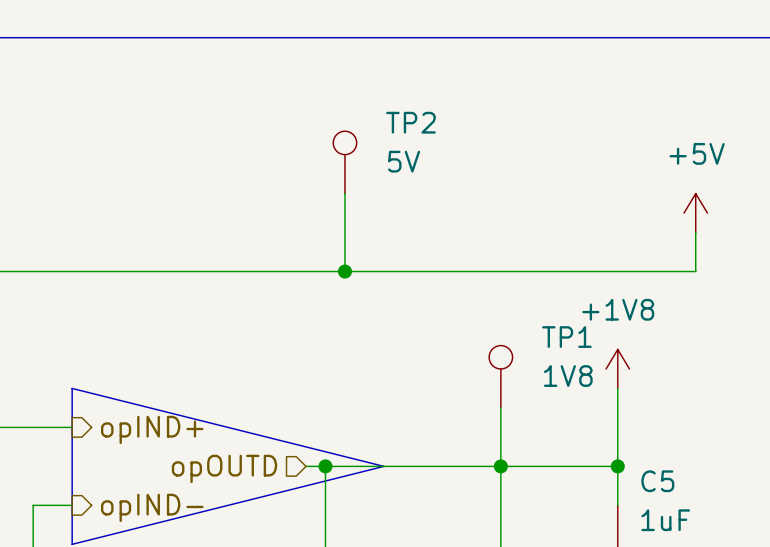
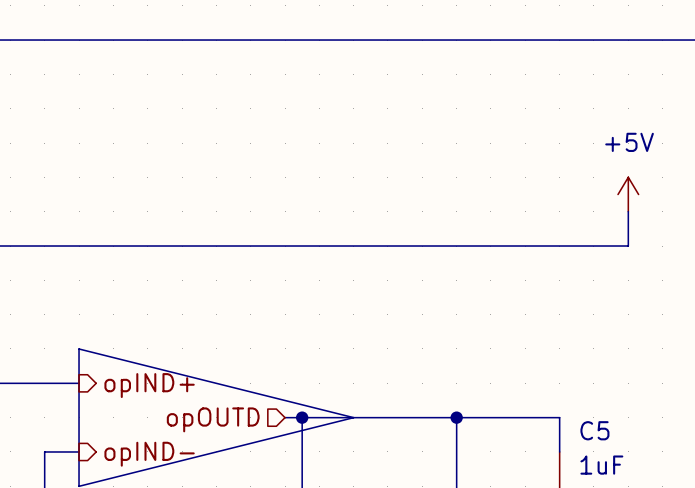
TP2: 5V (344, 162) -> none
wire: (344, 193) (344, 271) -> none
junction: (344, 271) -> none
power symbol: +1V8 (617, 368) -> none
TP1: 1V8 (500, 376) -> none
wire: (617, 388) (617, 466) -> none
wire: (500, 407) (500, 466) -> none
junction: (617, 466) -> none

